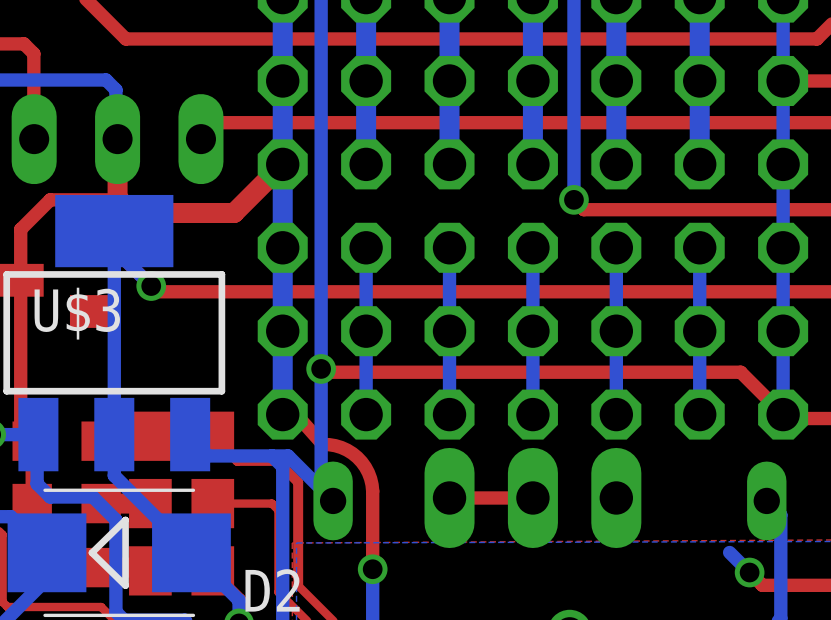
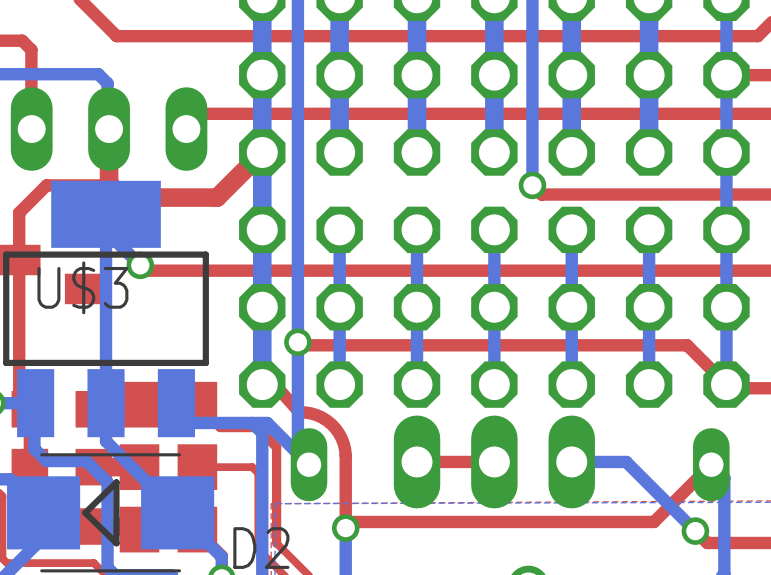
bottom track: none -> (571, 461) (626, 461) (676, 512)
top track: none -> (711, 464) (654, 521) (351, 521) (345, 528)

